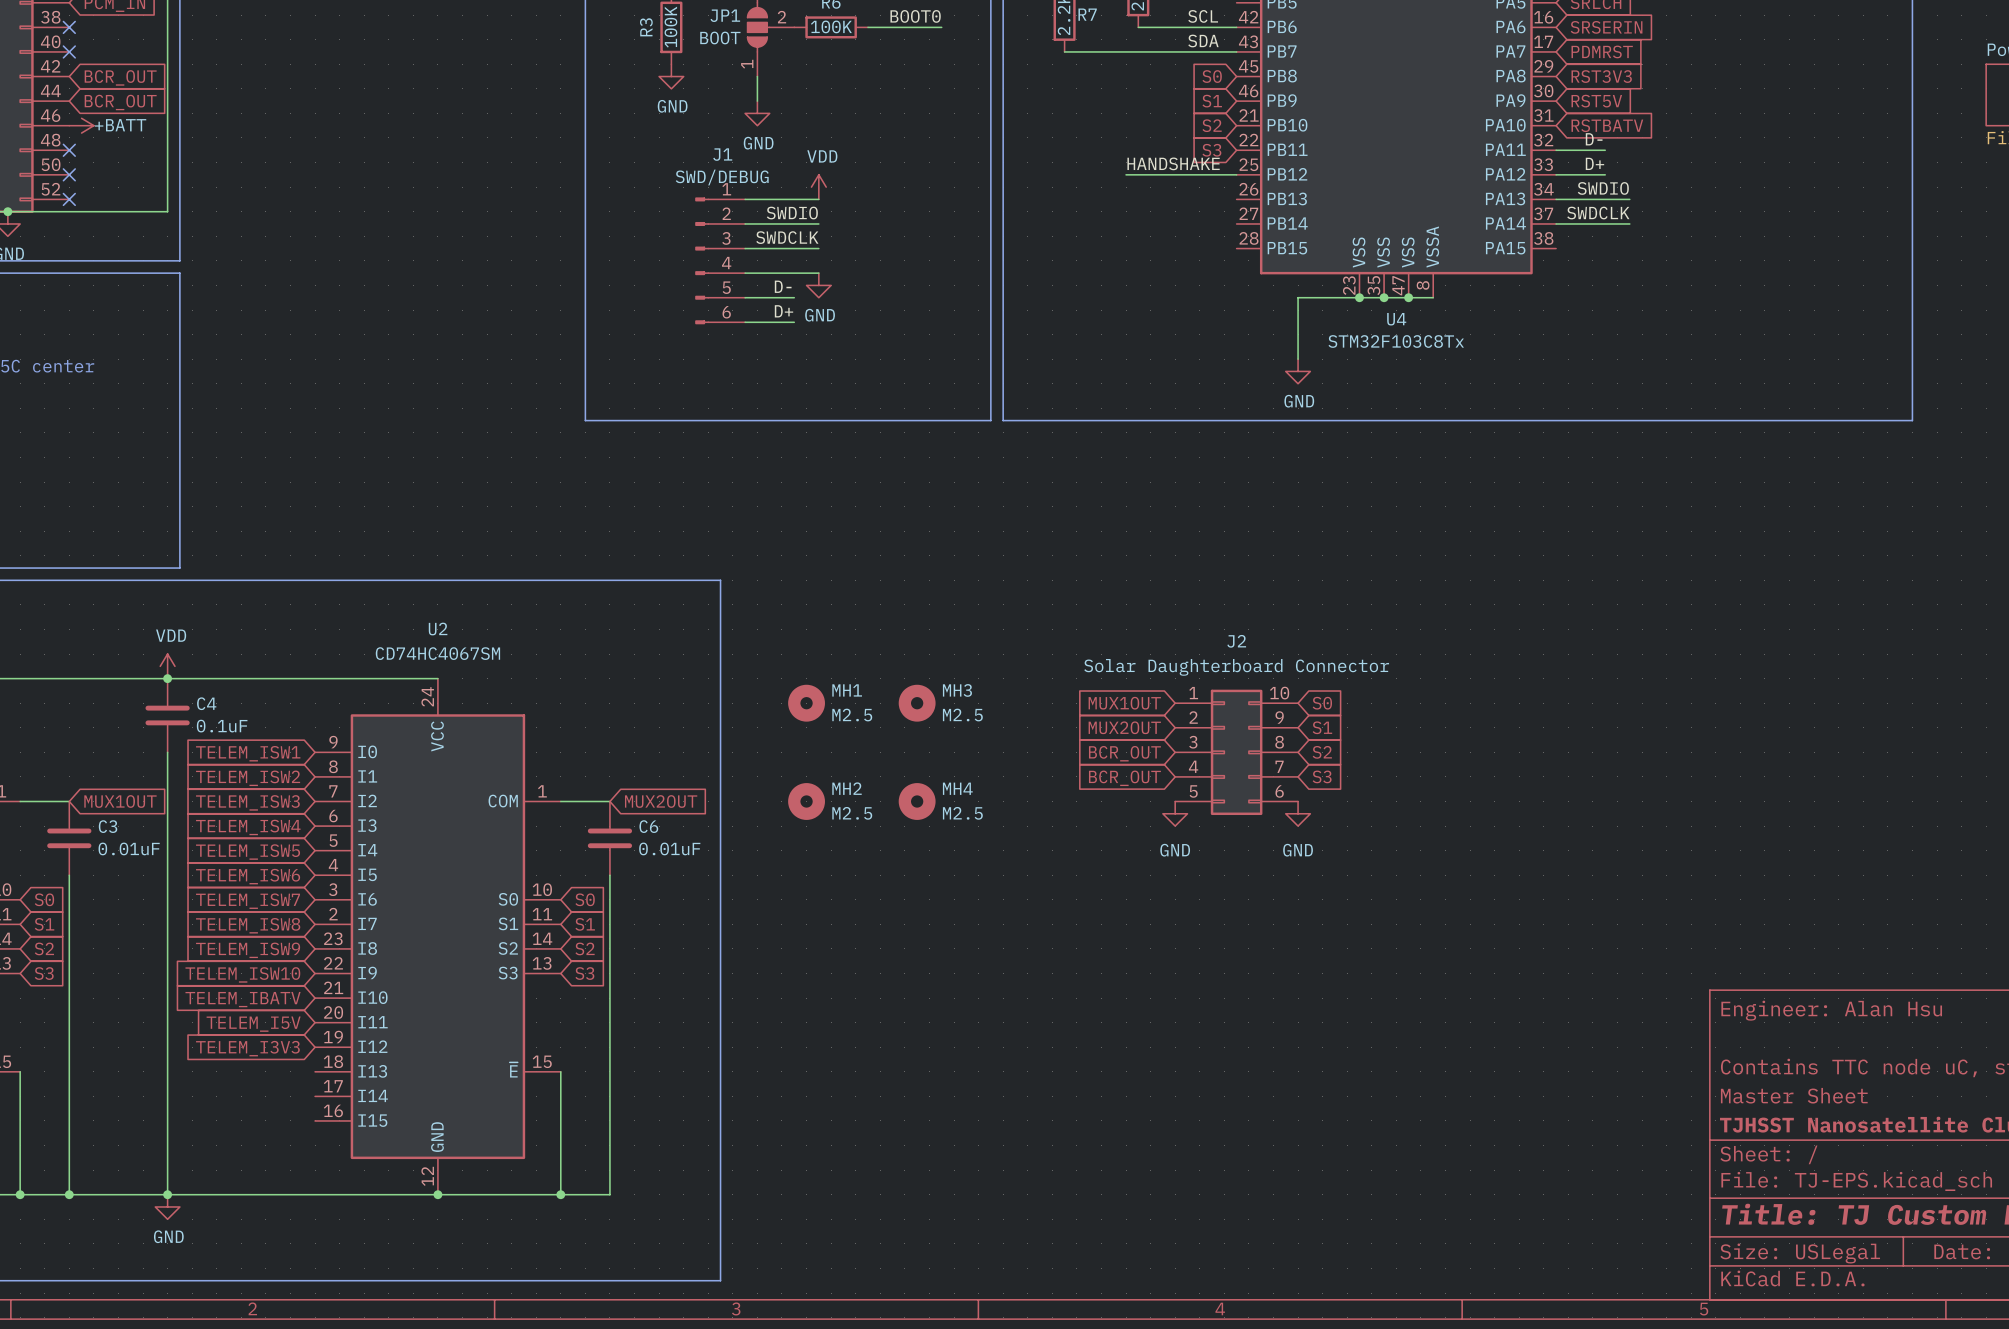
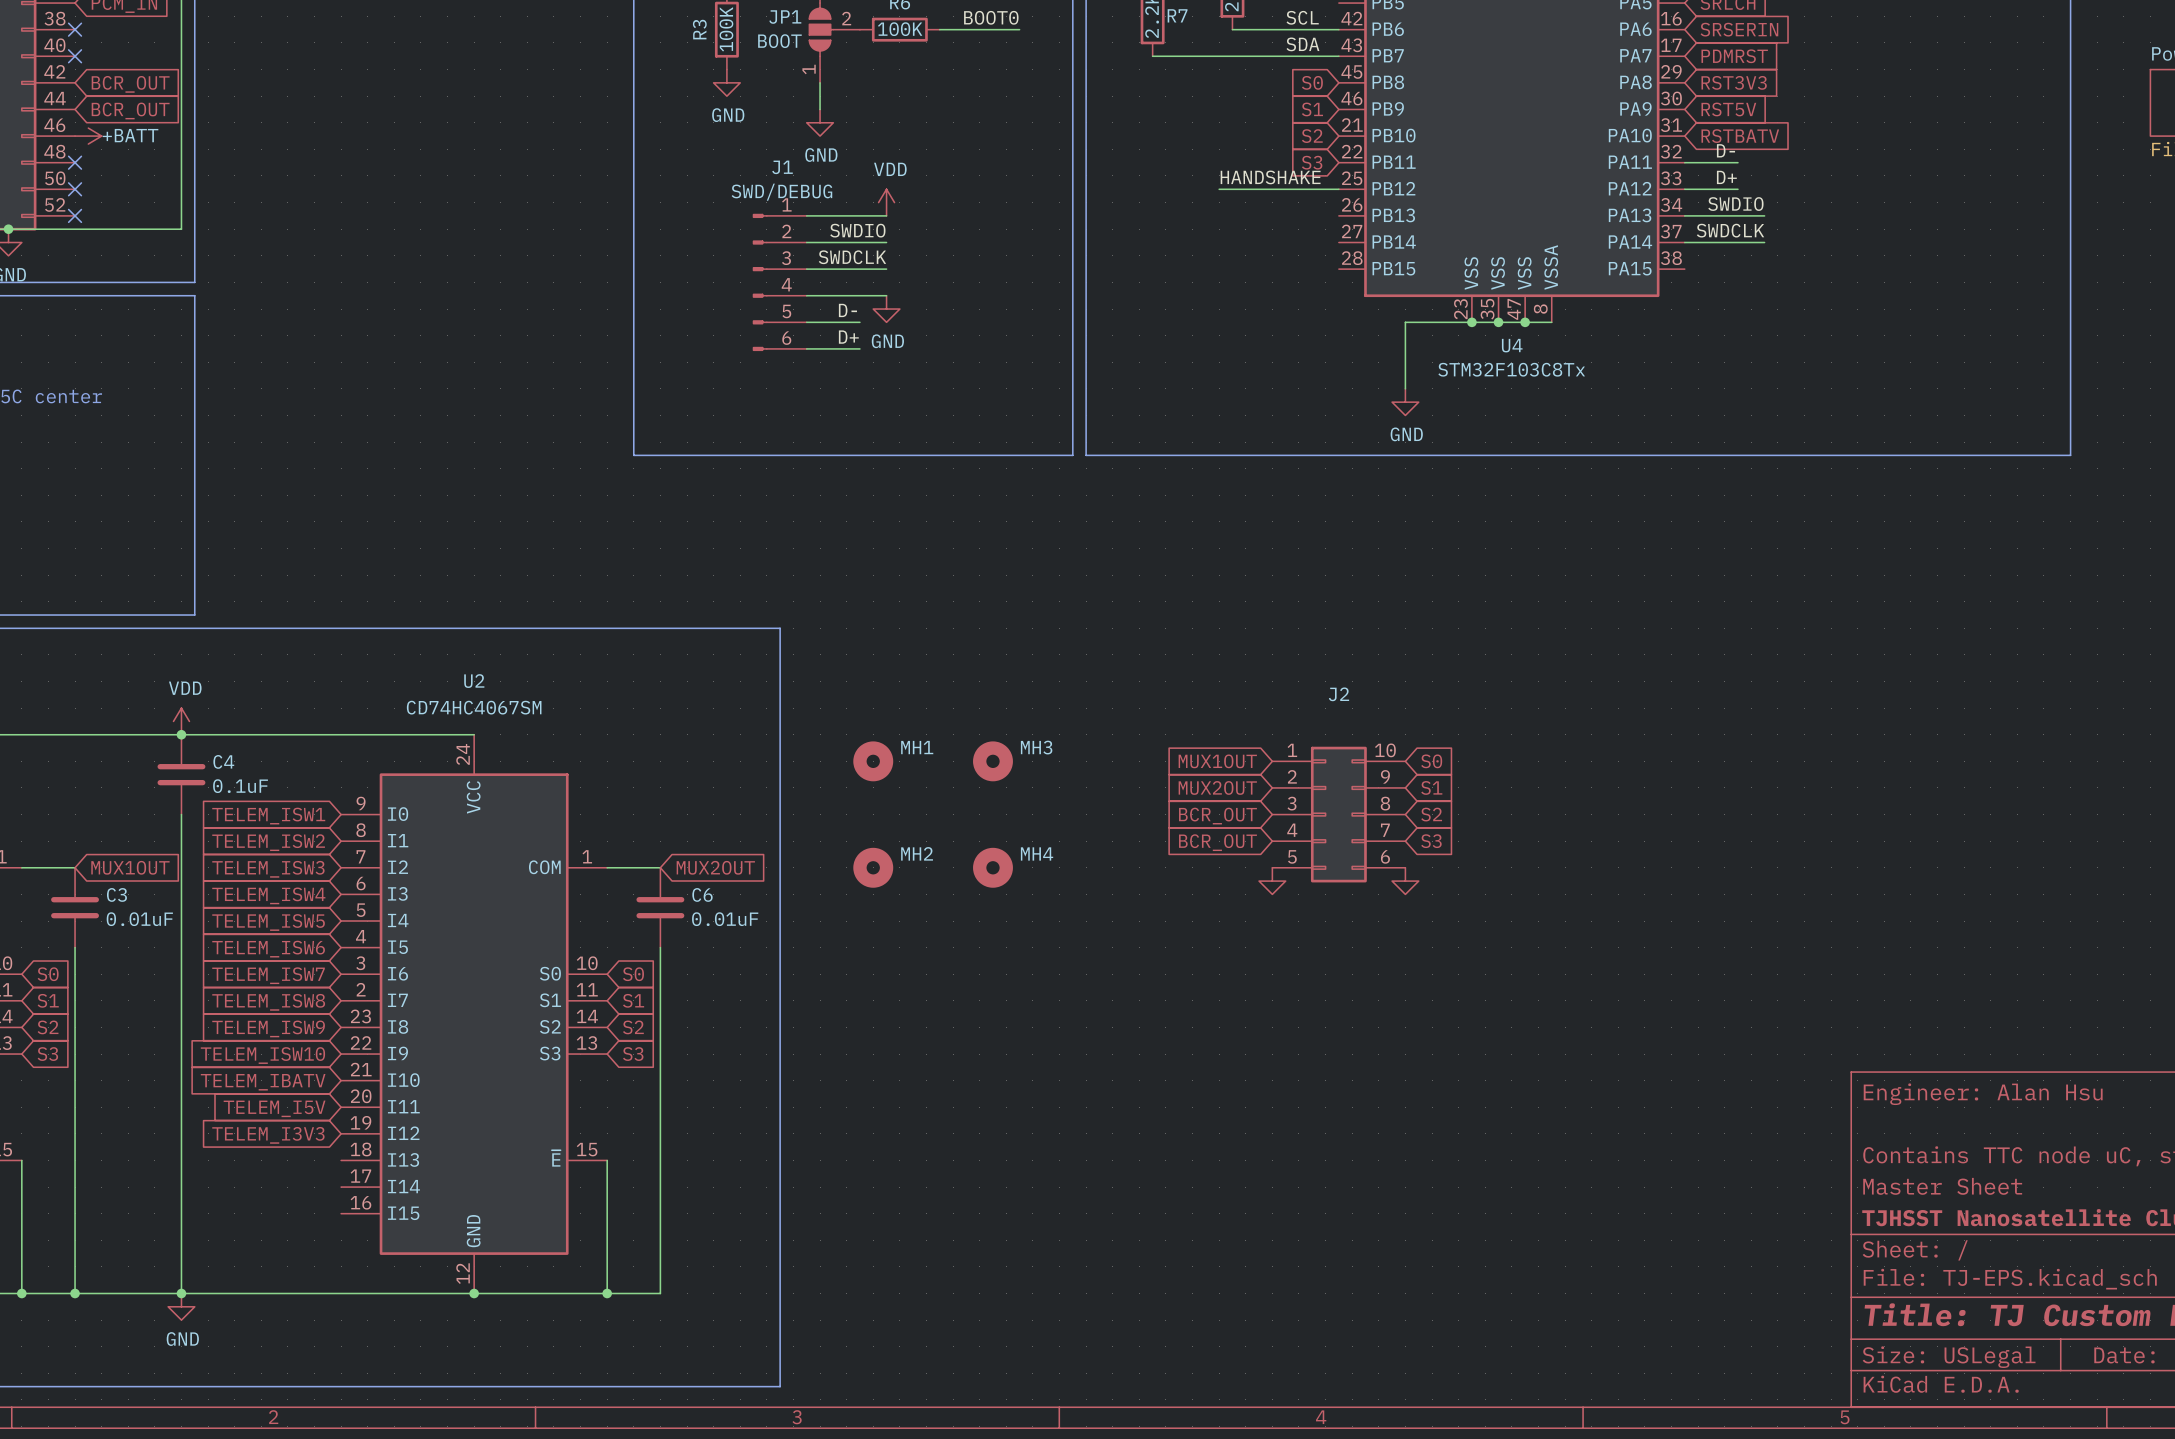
J2 value: Solar Daughterboard Connector (1236, 667) -> none
MH1 value: M2.5 (852, 715) -> none
MH3 value: M2.5 (962, 715) -> none
MH2 value: M2.5 (852, 813) -> none
MH4 value: M2.5 (962, 813) -> none
power symbol text: GND (1175, 850) -> none
power symbol text: GND (1298, 850) -> none

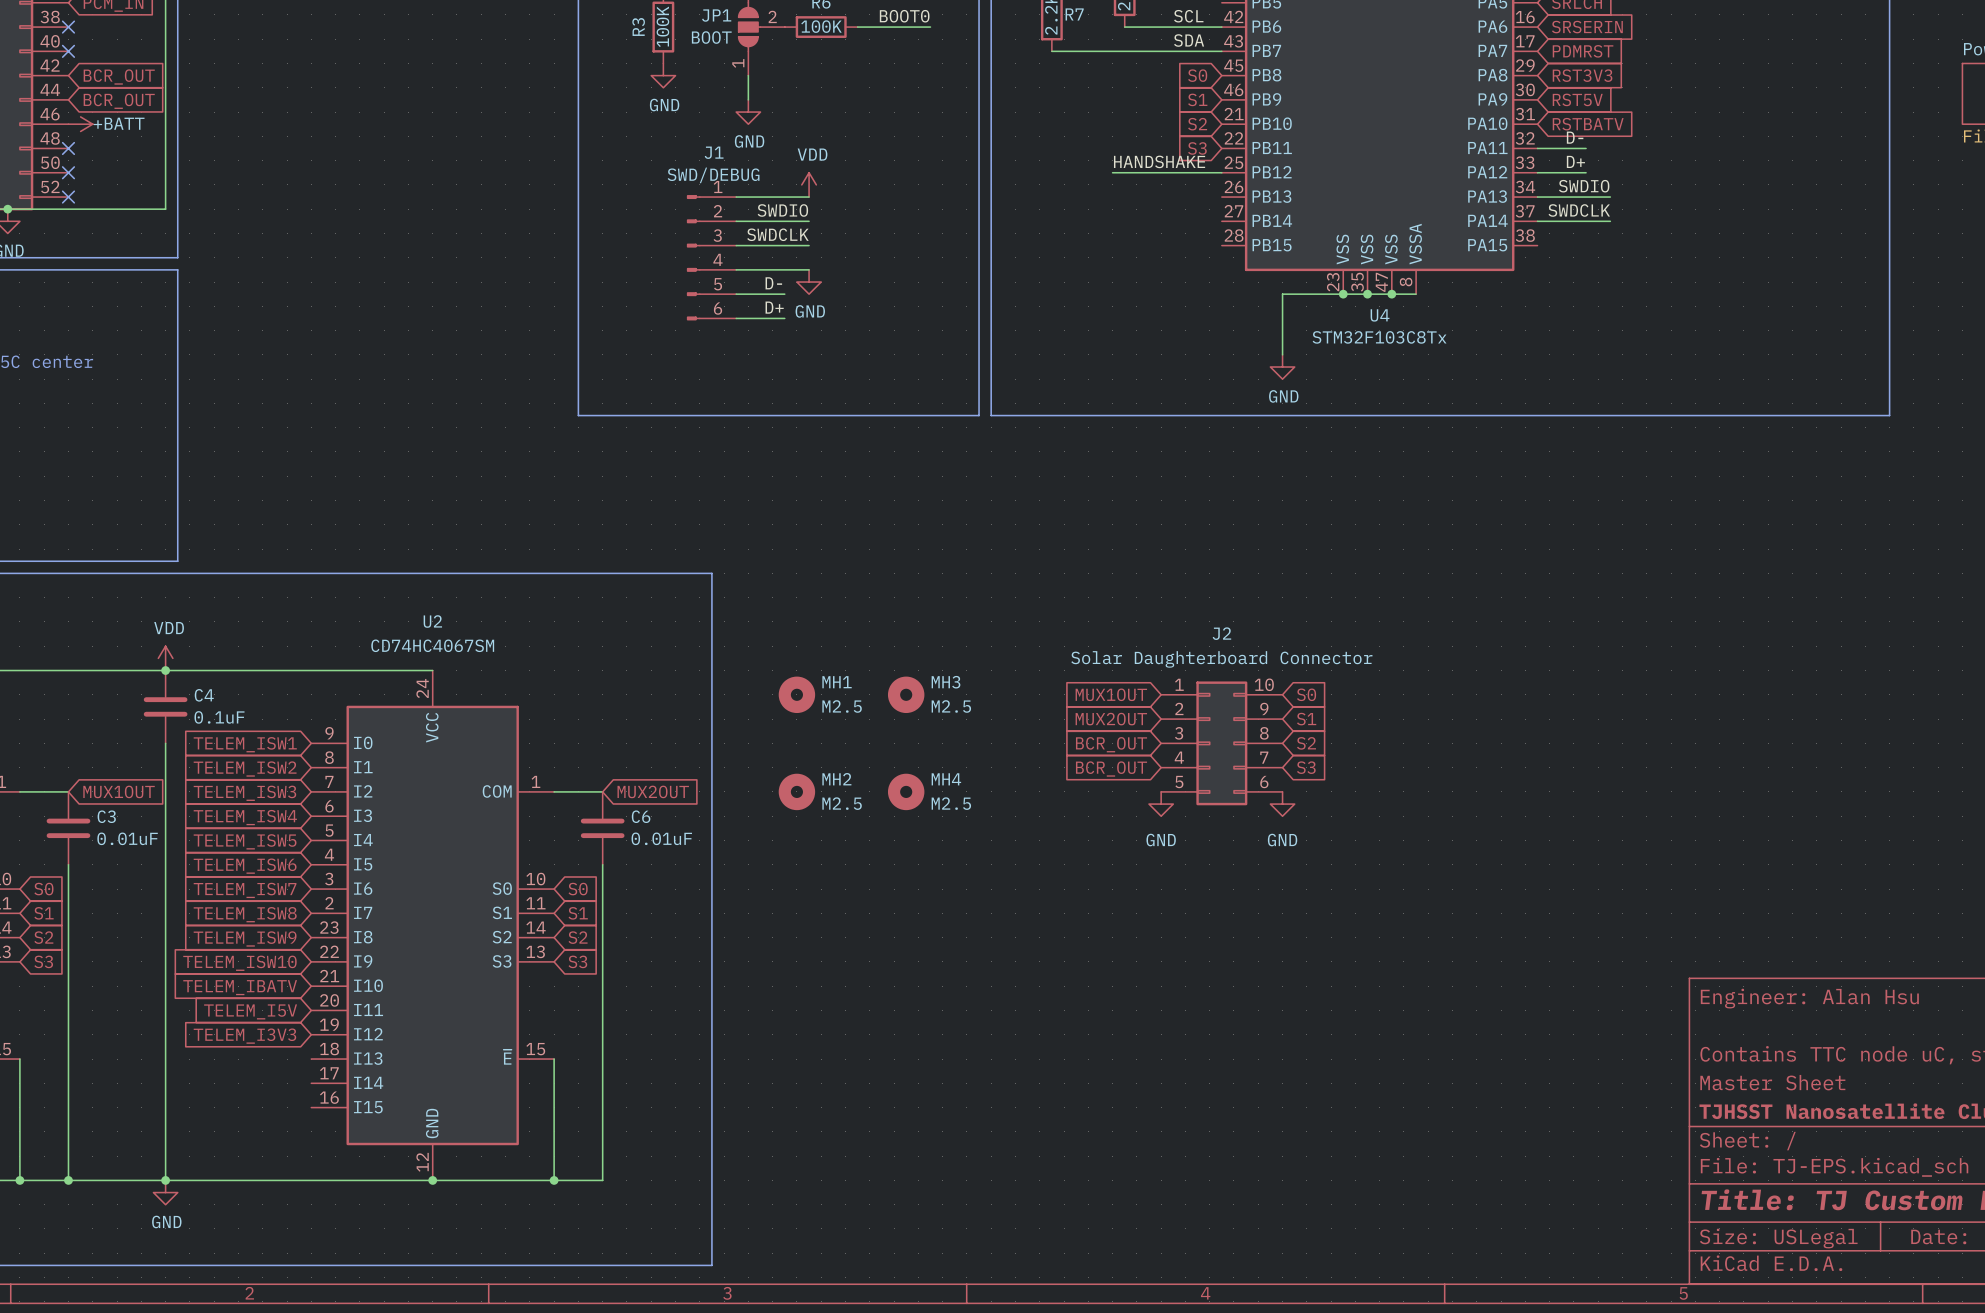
J2 value: none -> Solar Daughterboard Connector (1221, 659)
MH1 value: none -> M2.5 (842, 706)
MH3 value: none -> M2.5 (951, 706)
MH2 value: none -> M2.5 (842, 803)
MH4 value: none -> M2.5 (951, 803)
power symbol text: none -> GND (1161, 840)
power symbol text: none -> GND (1282, 840)

